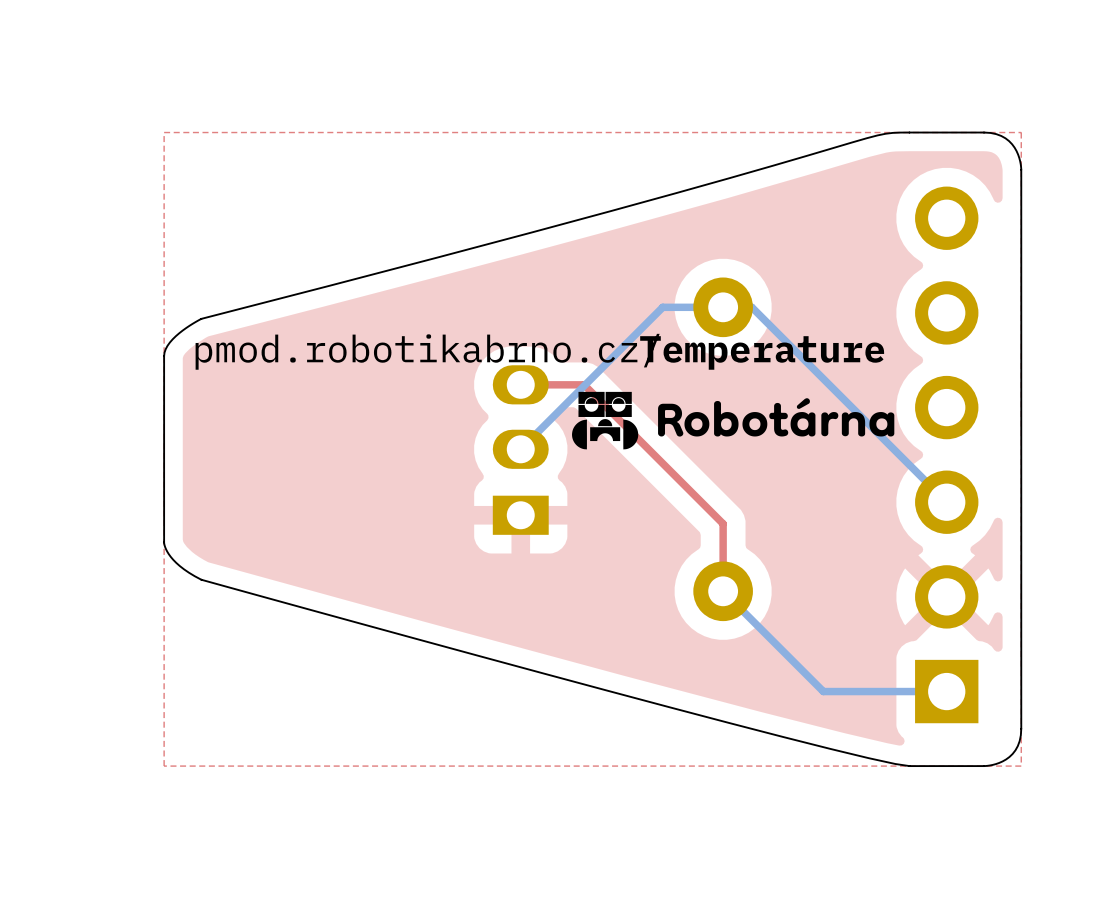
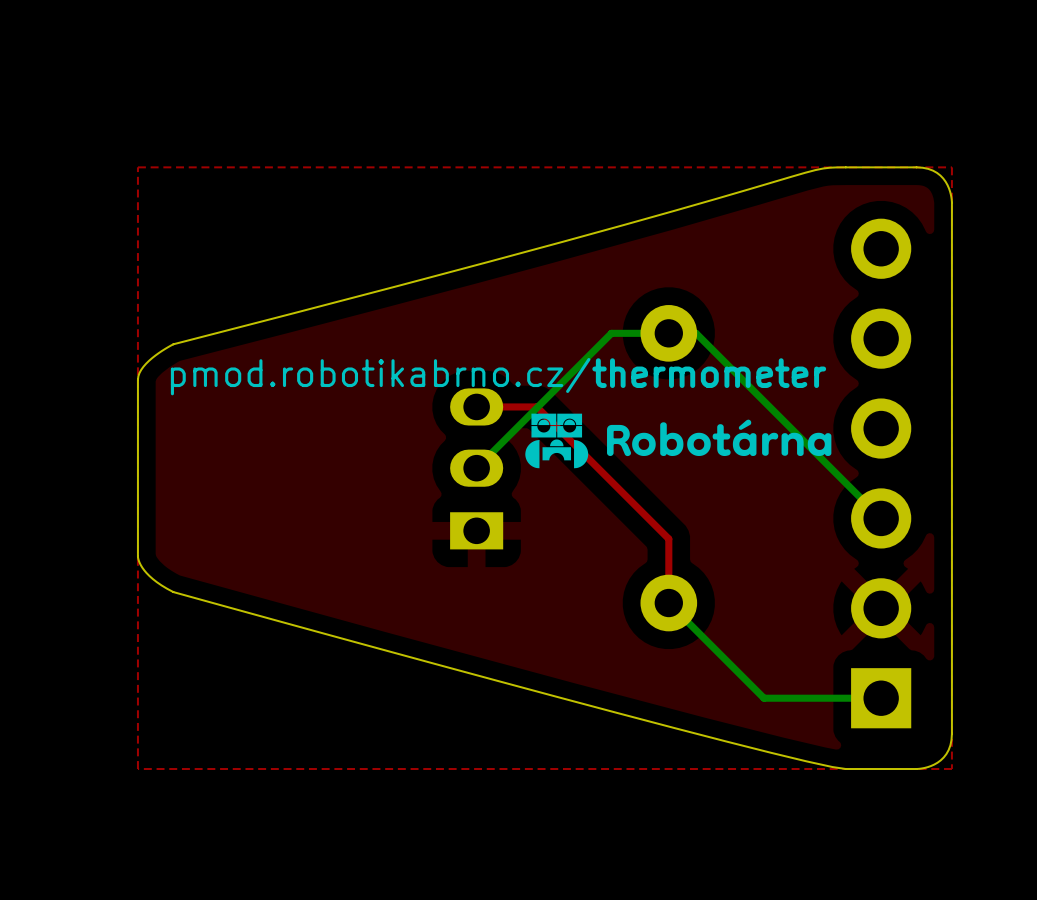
text: Temperature (762, 352) -> thermometer (709, 373)

